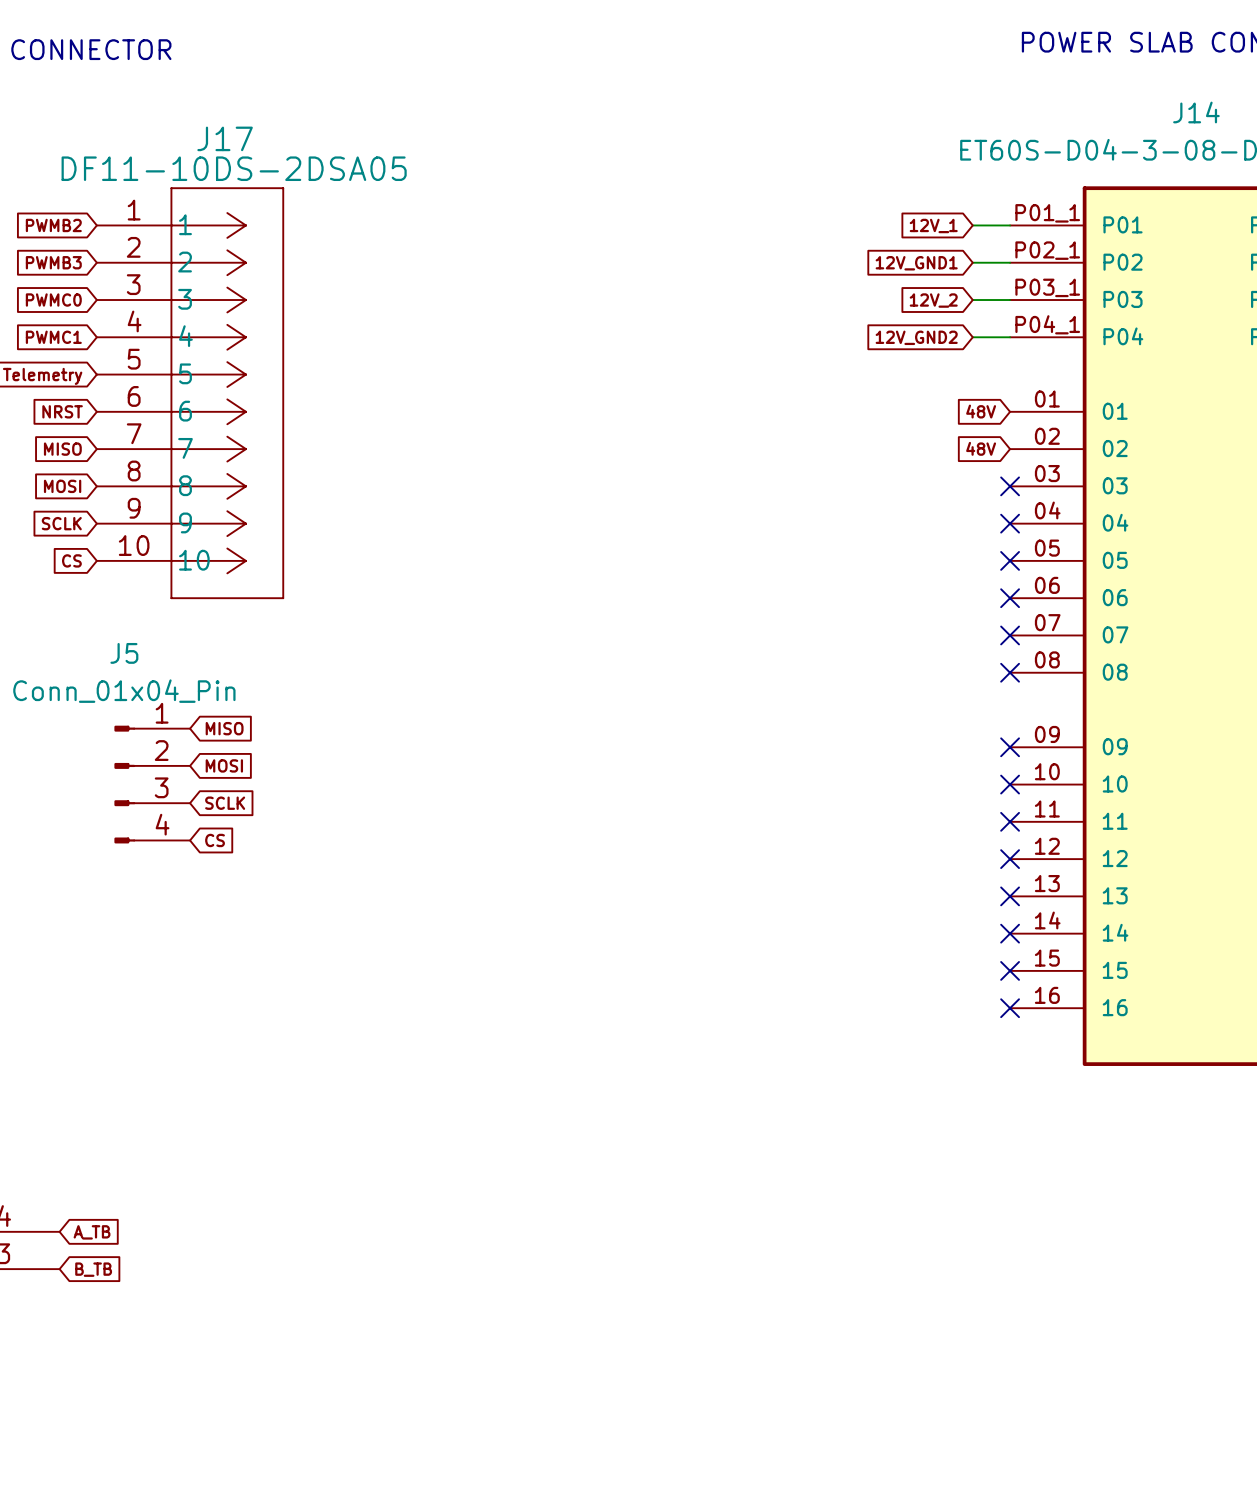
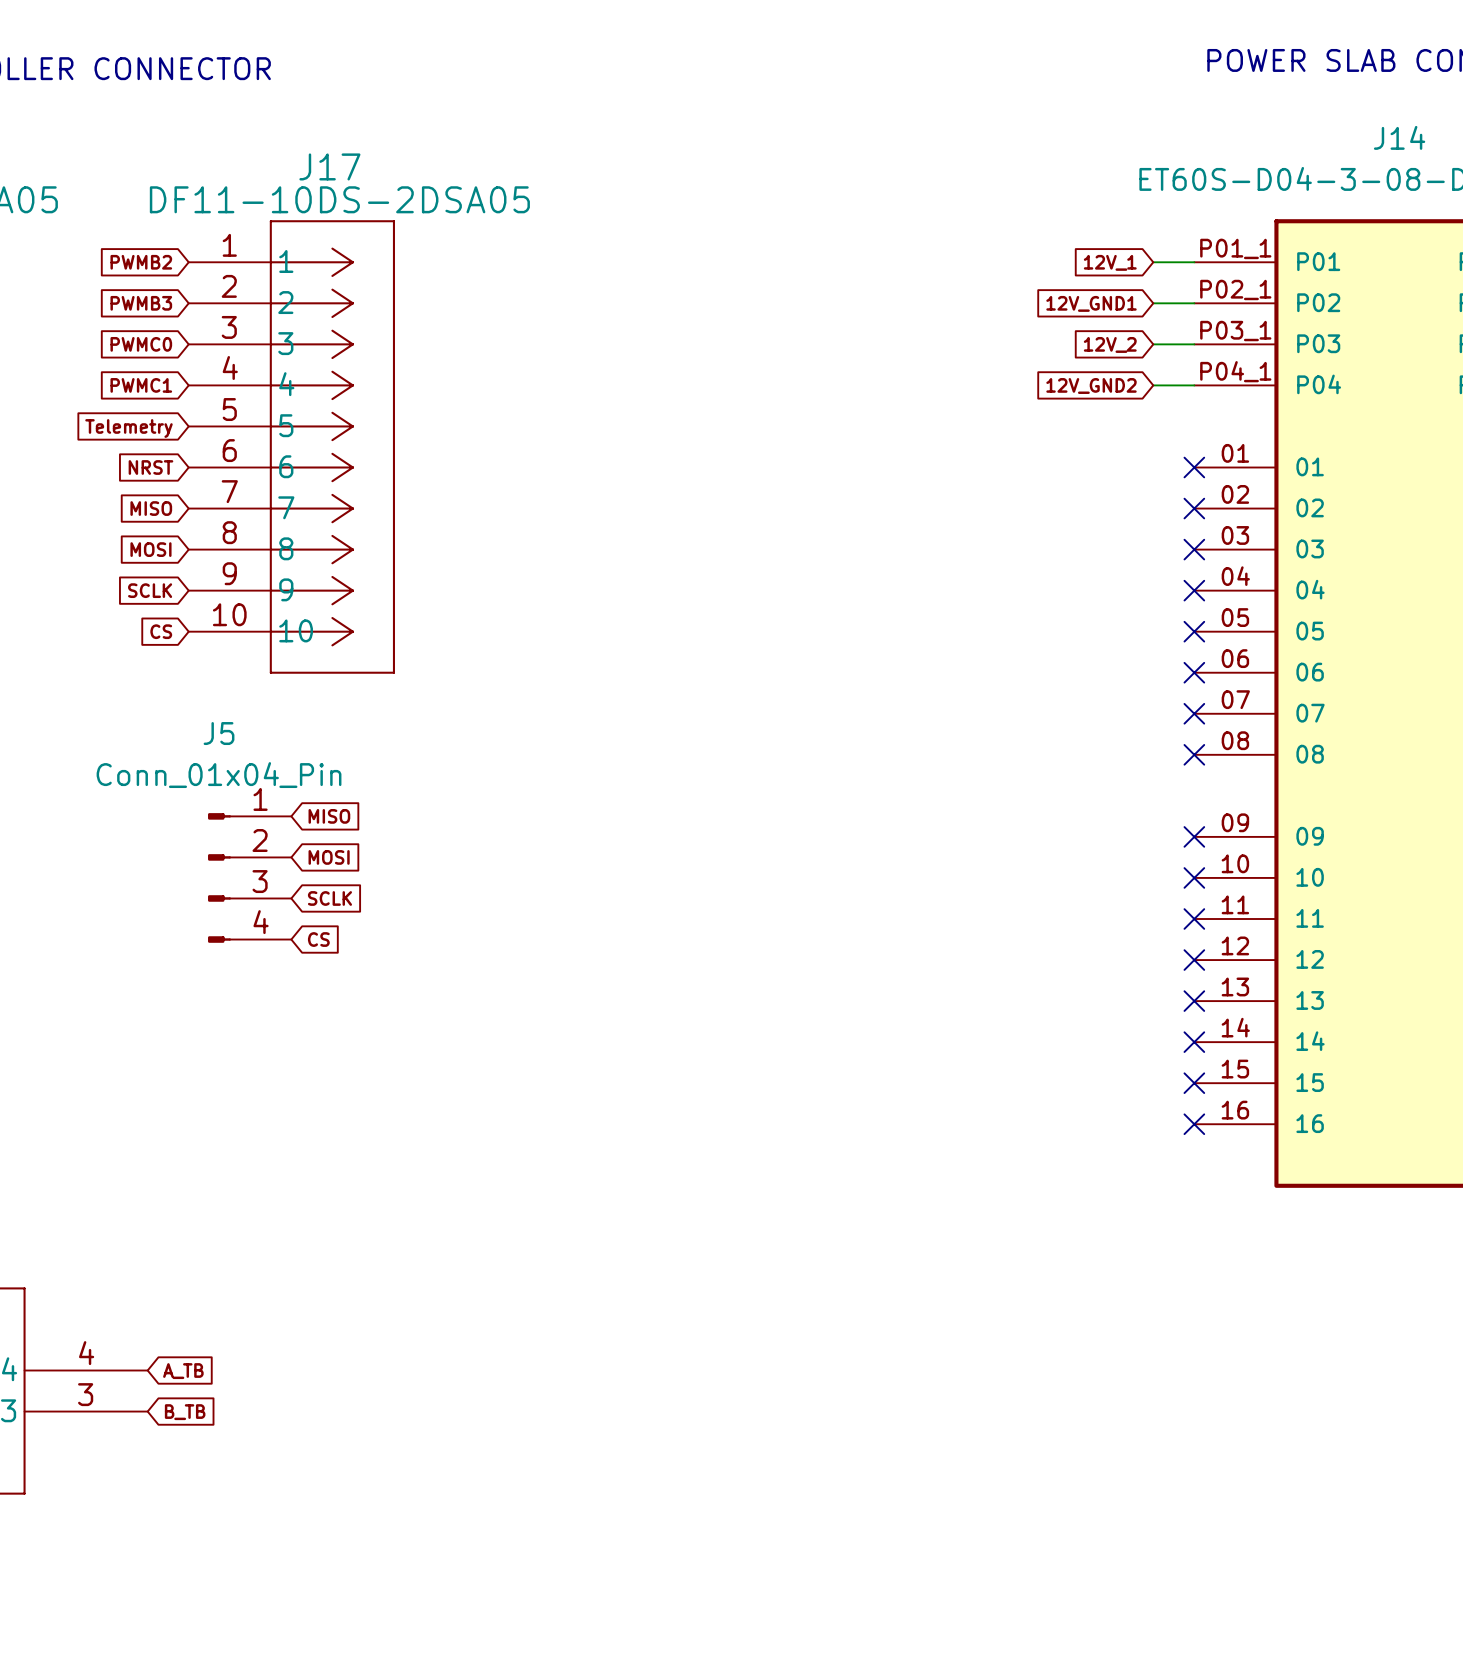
global label: 48V (981, 411) -> none
no-connect mark: none -> (1194, 467)
global label: 48V (981, 448) -> none
no-connect mark: none -> (1194, 508)

